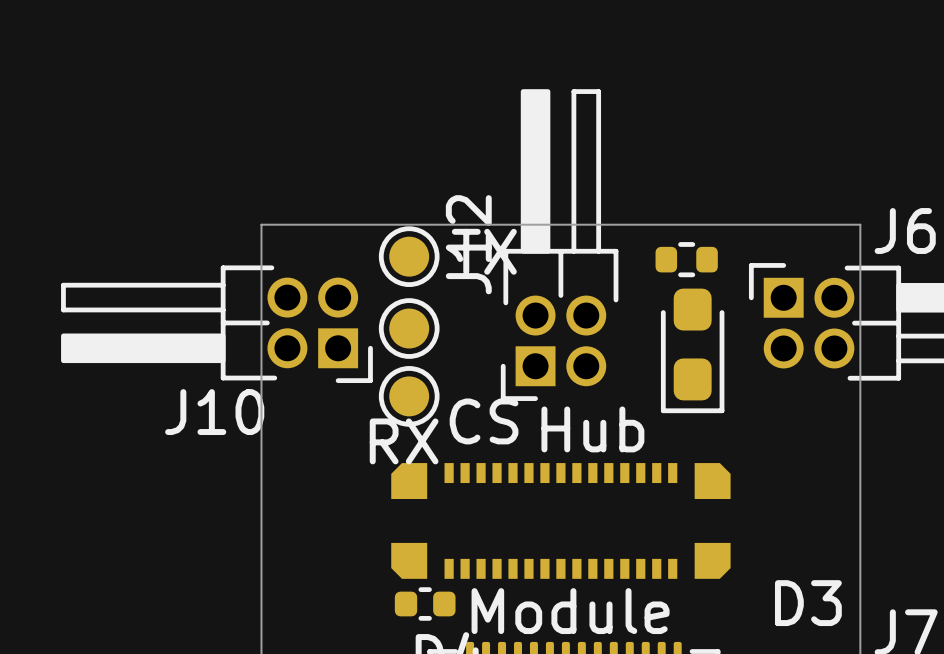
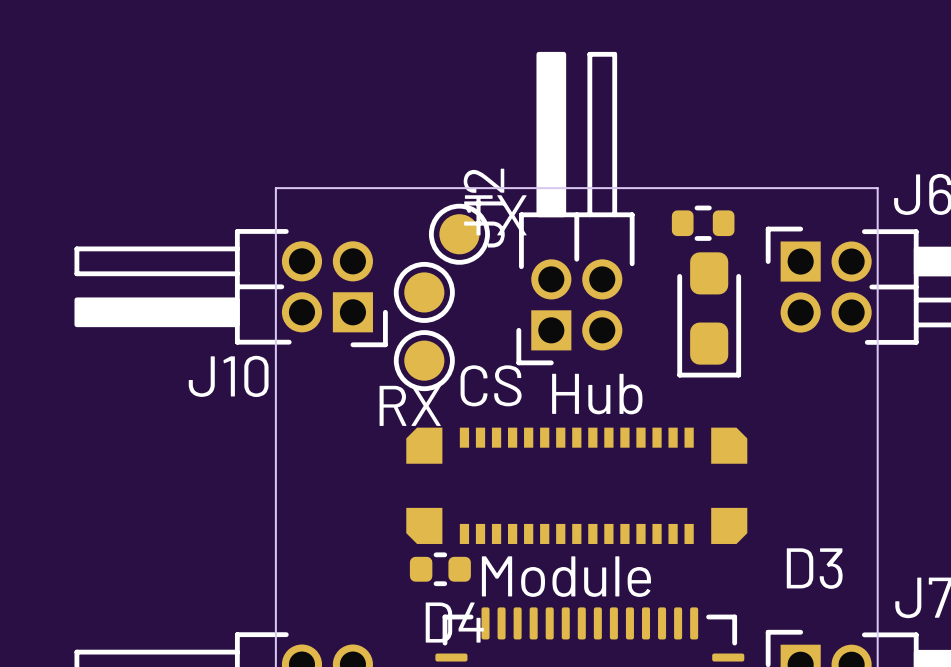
part position: (409, 256) -> (459, 234)

